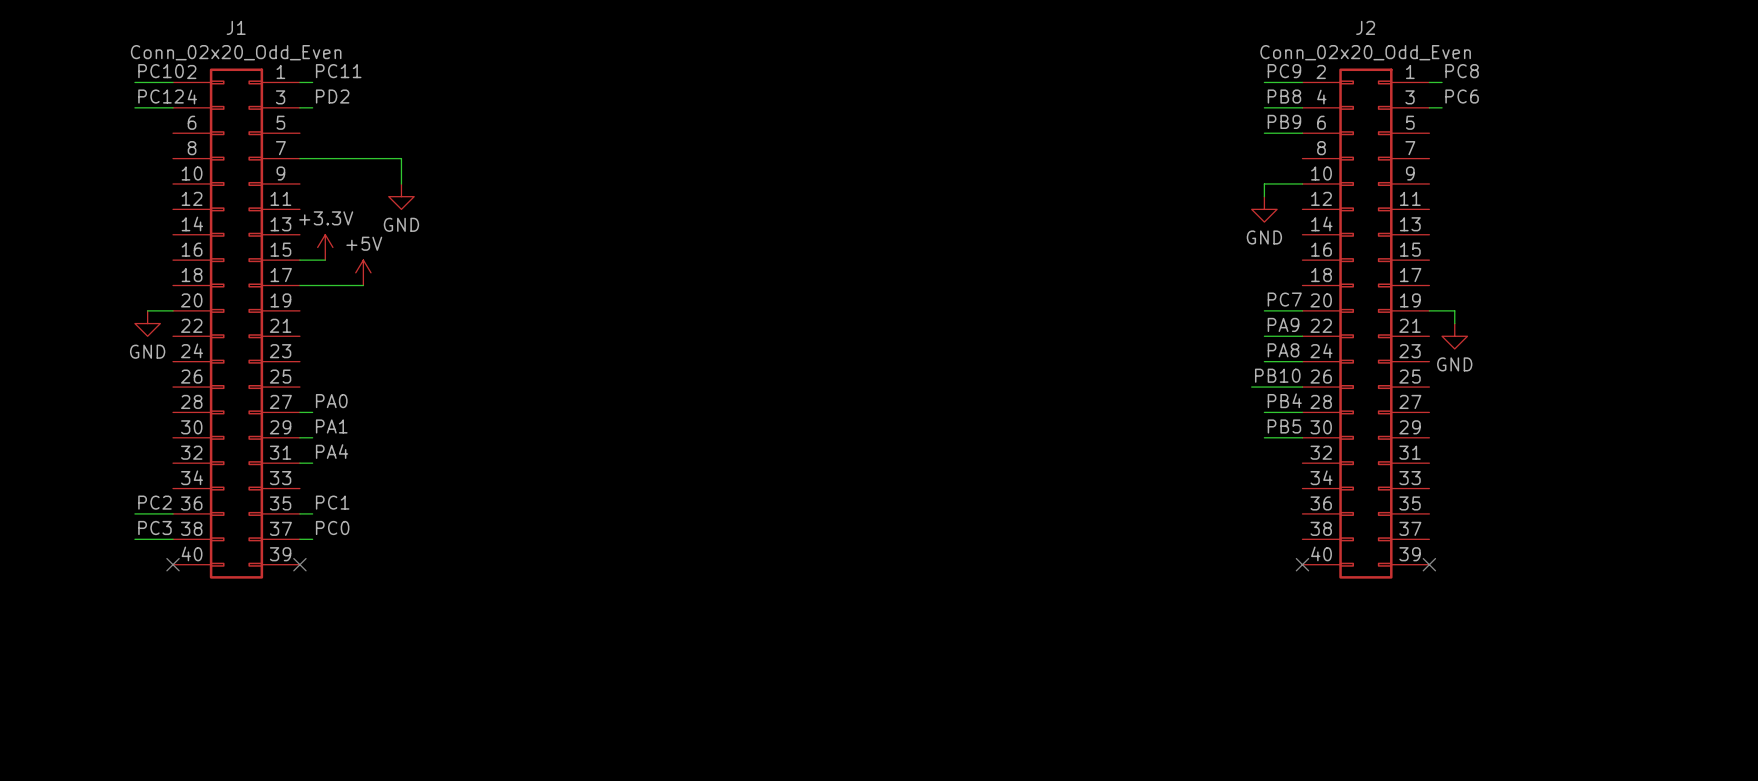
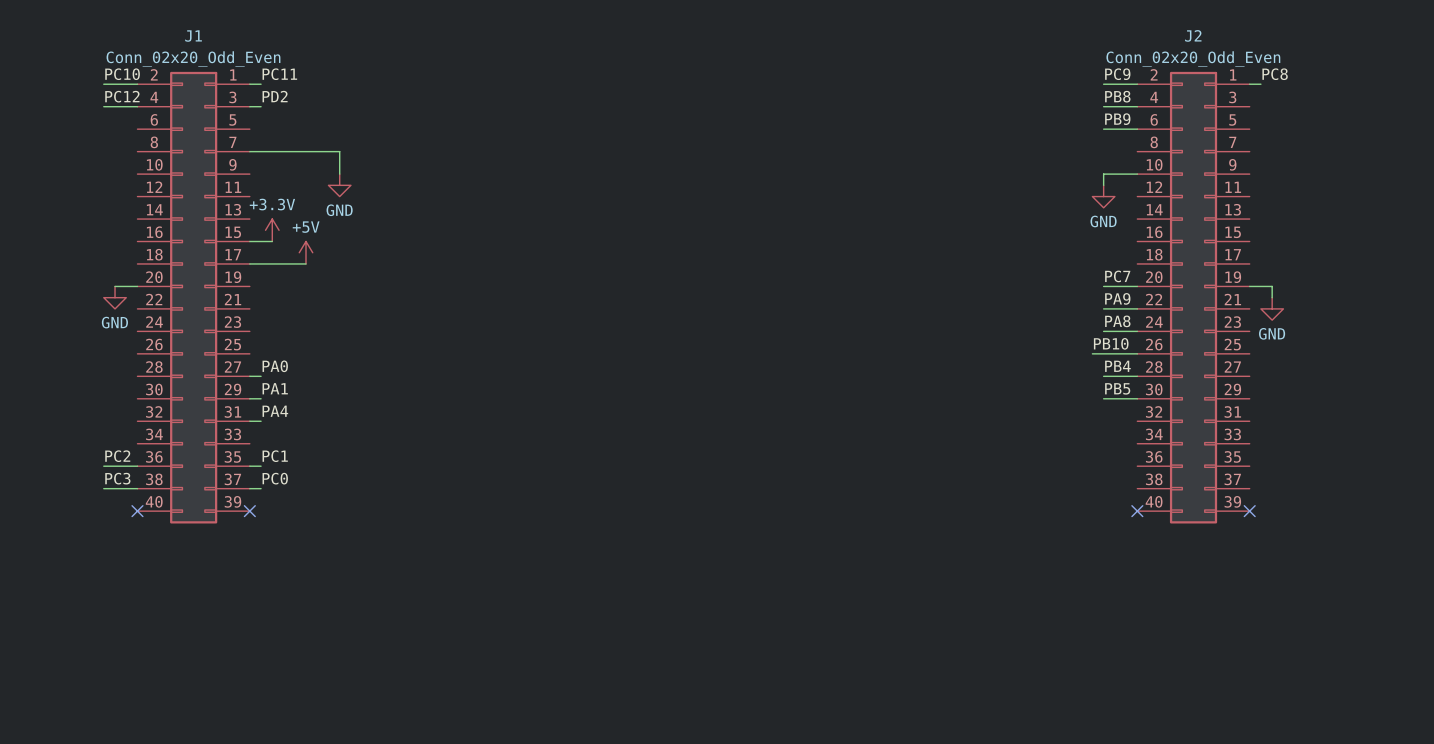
label: PC6 (1462, 96) -> none
wire: (1429, 107) (1442, 107) -> none

